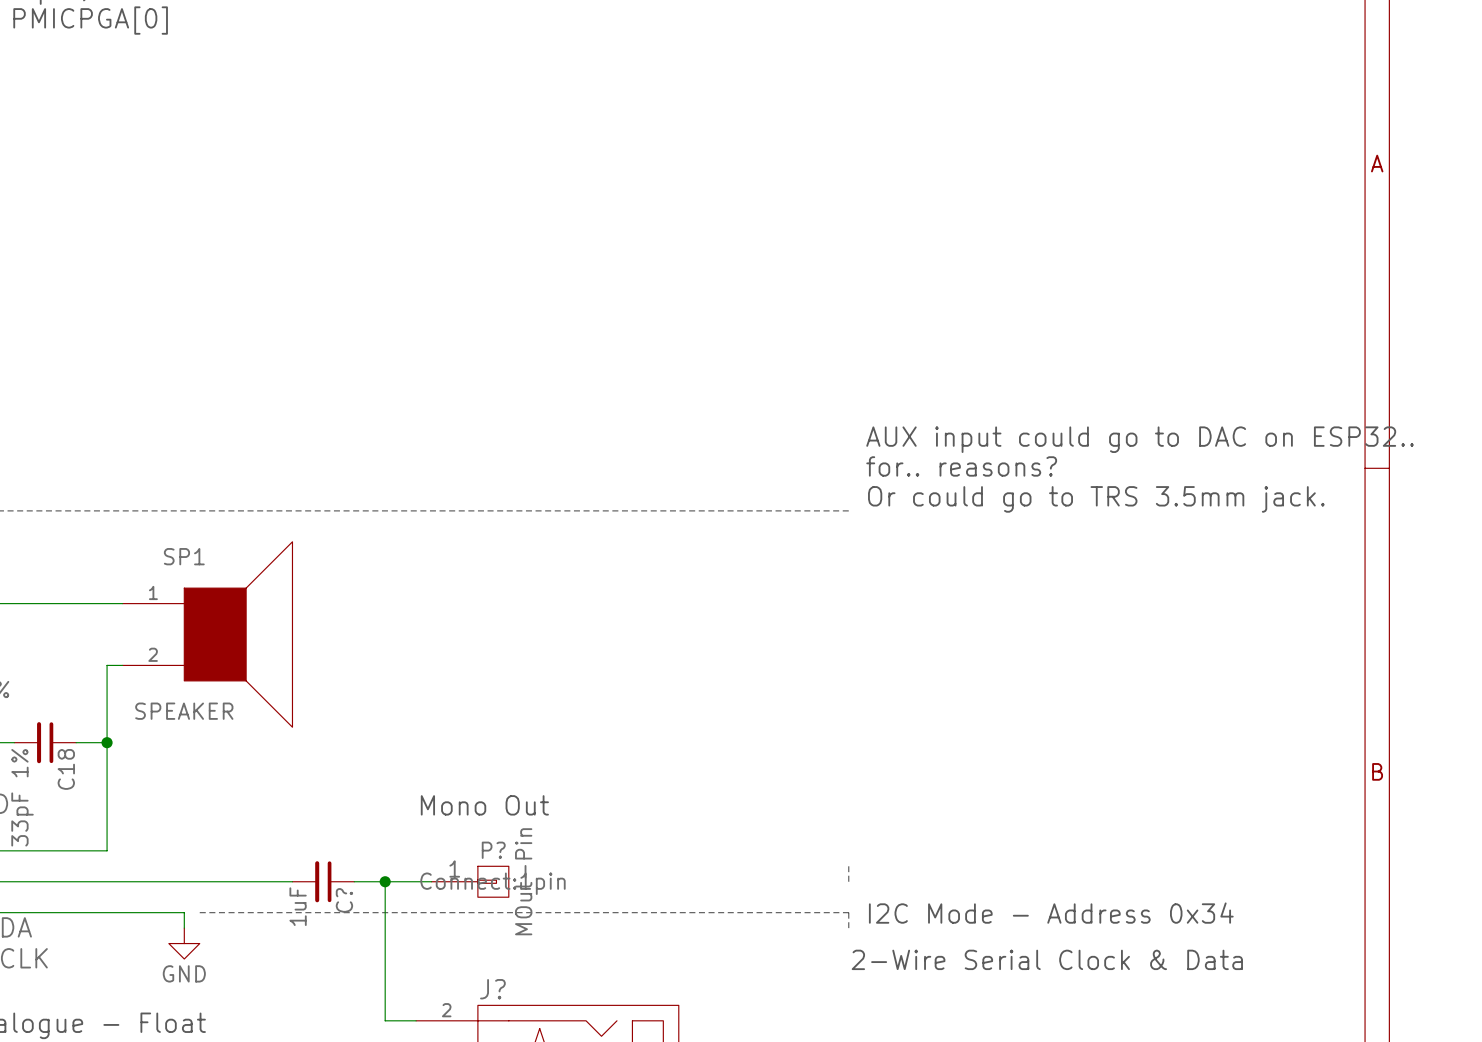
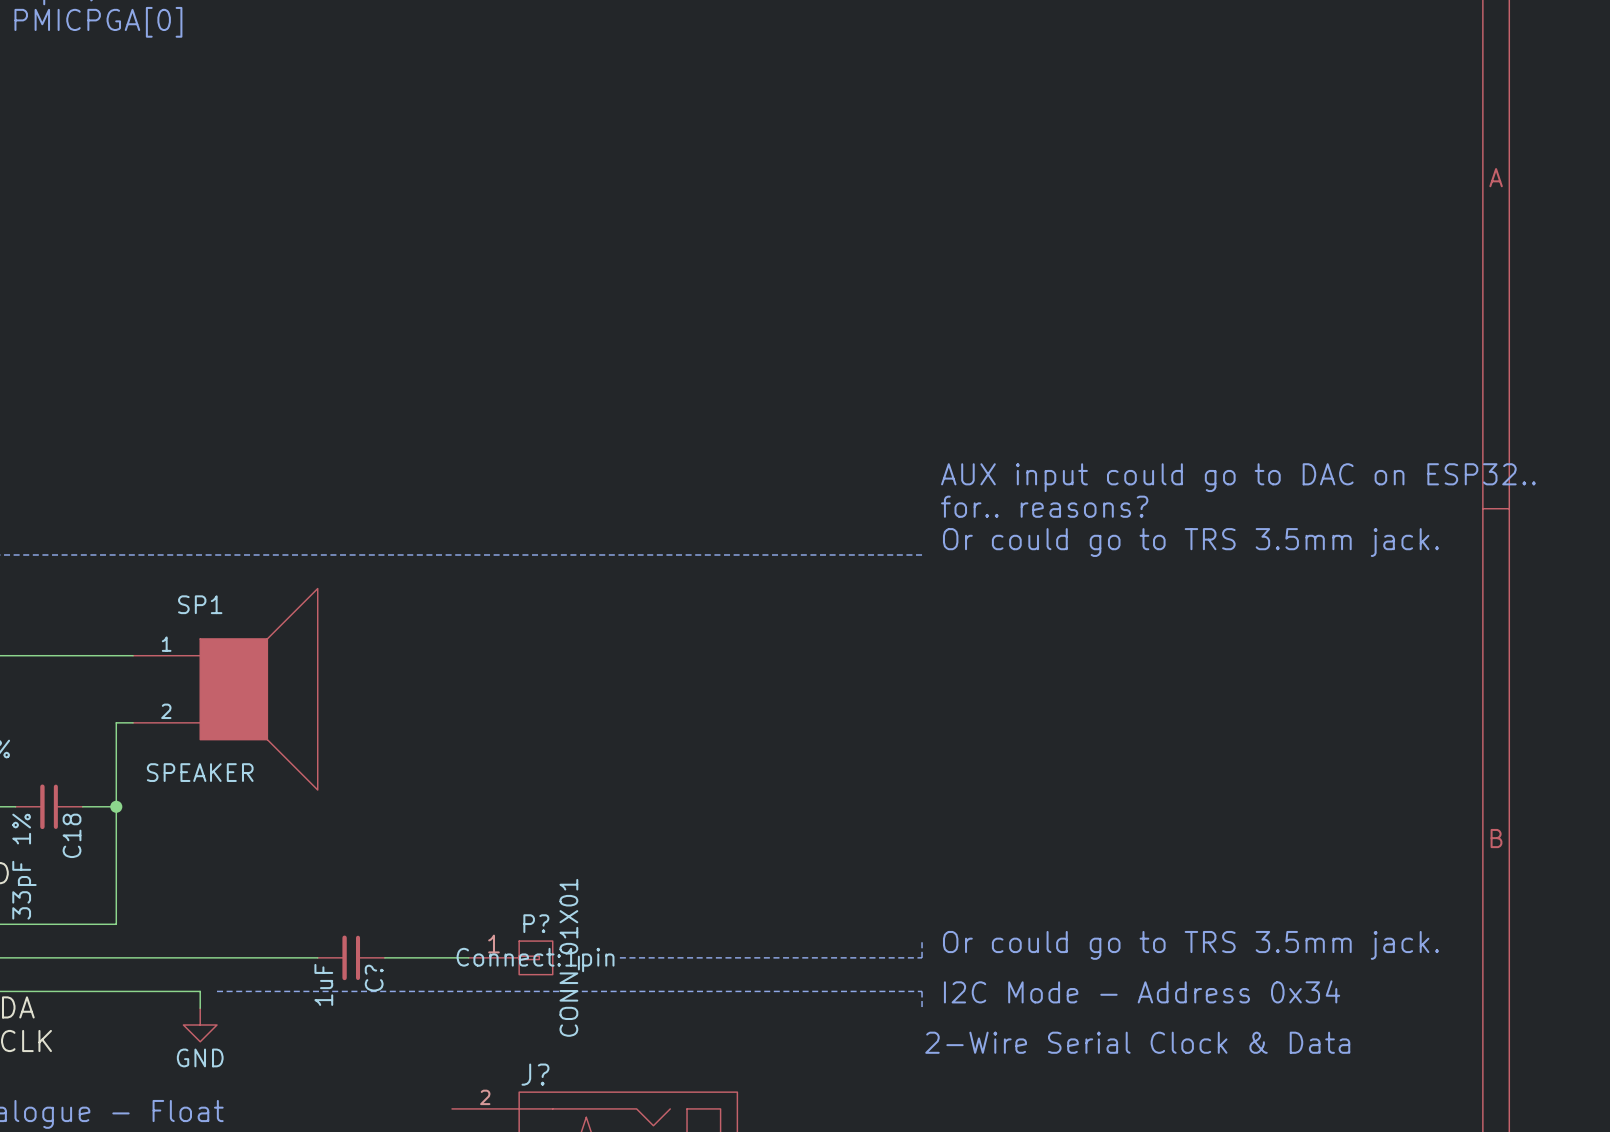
text: Mono Out (484, 805) -> none
text: none -> Or could go to TRS 3.5mm jack. (1190, 945)
wire: (385, 881) (385, 1020) (416, 1020) -> none
junction: (385, 881) -> none
P? value: MOut-Pin (523, 881) -> CONN_01X01 (569, 957)
line: none -> (619, 957) (922, 957)

